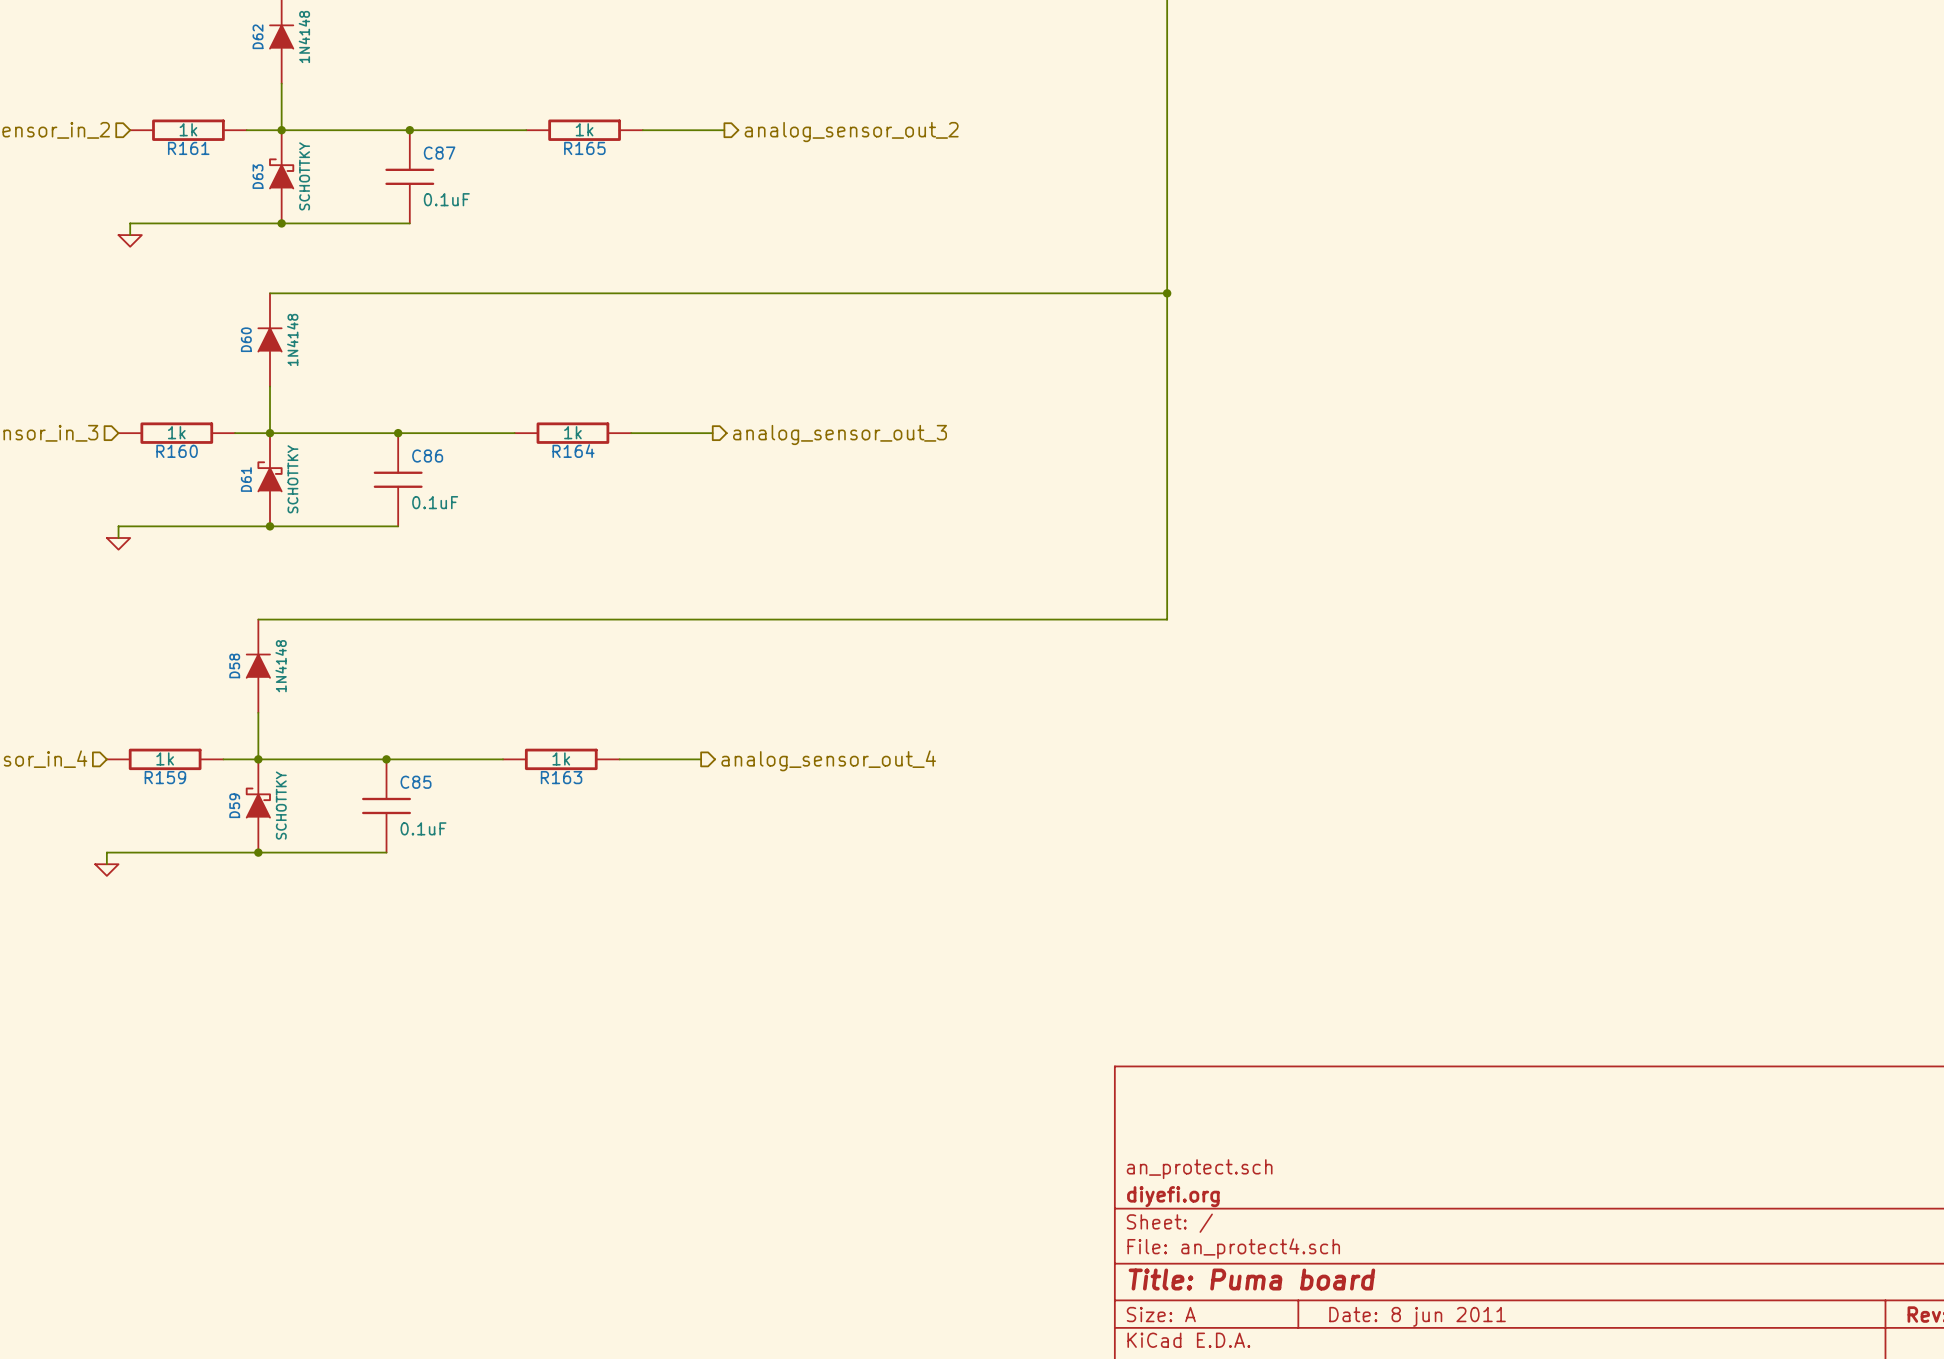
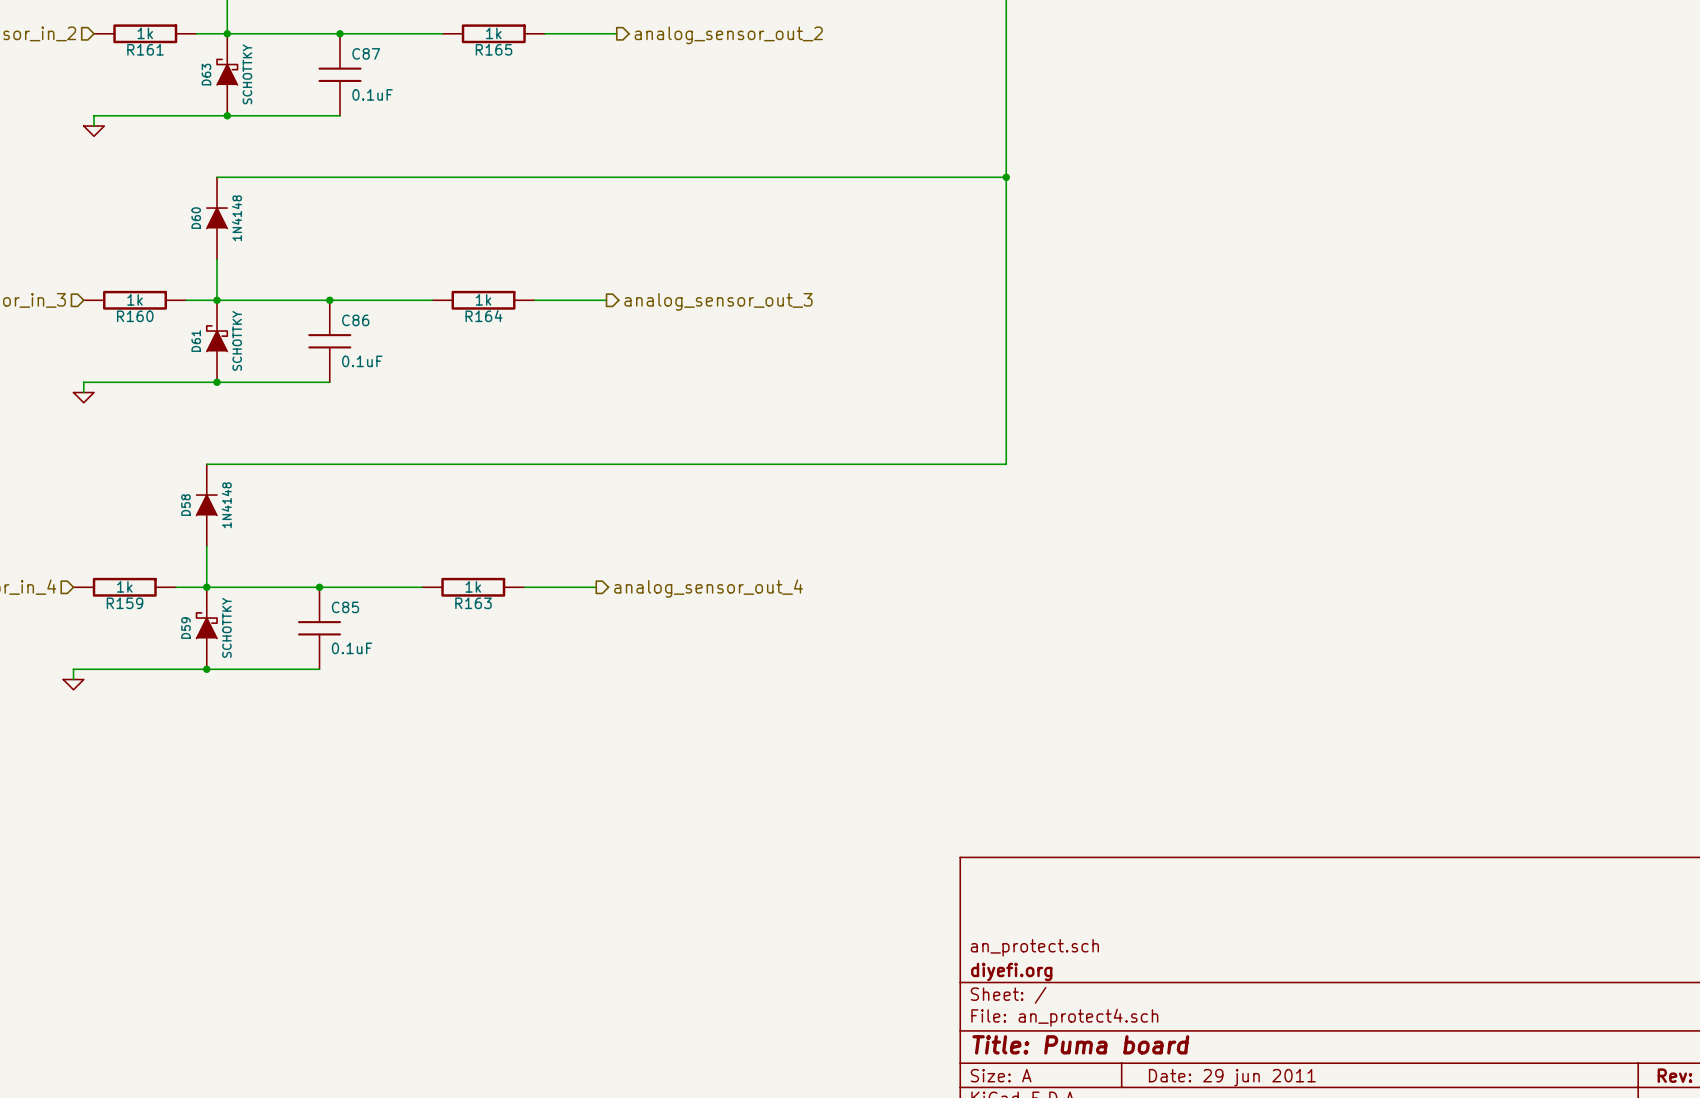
title block: Date: 8 jun 2011 (1417, 1316) -> Date: 29 jun 2011 (1232, 1077)

